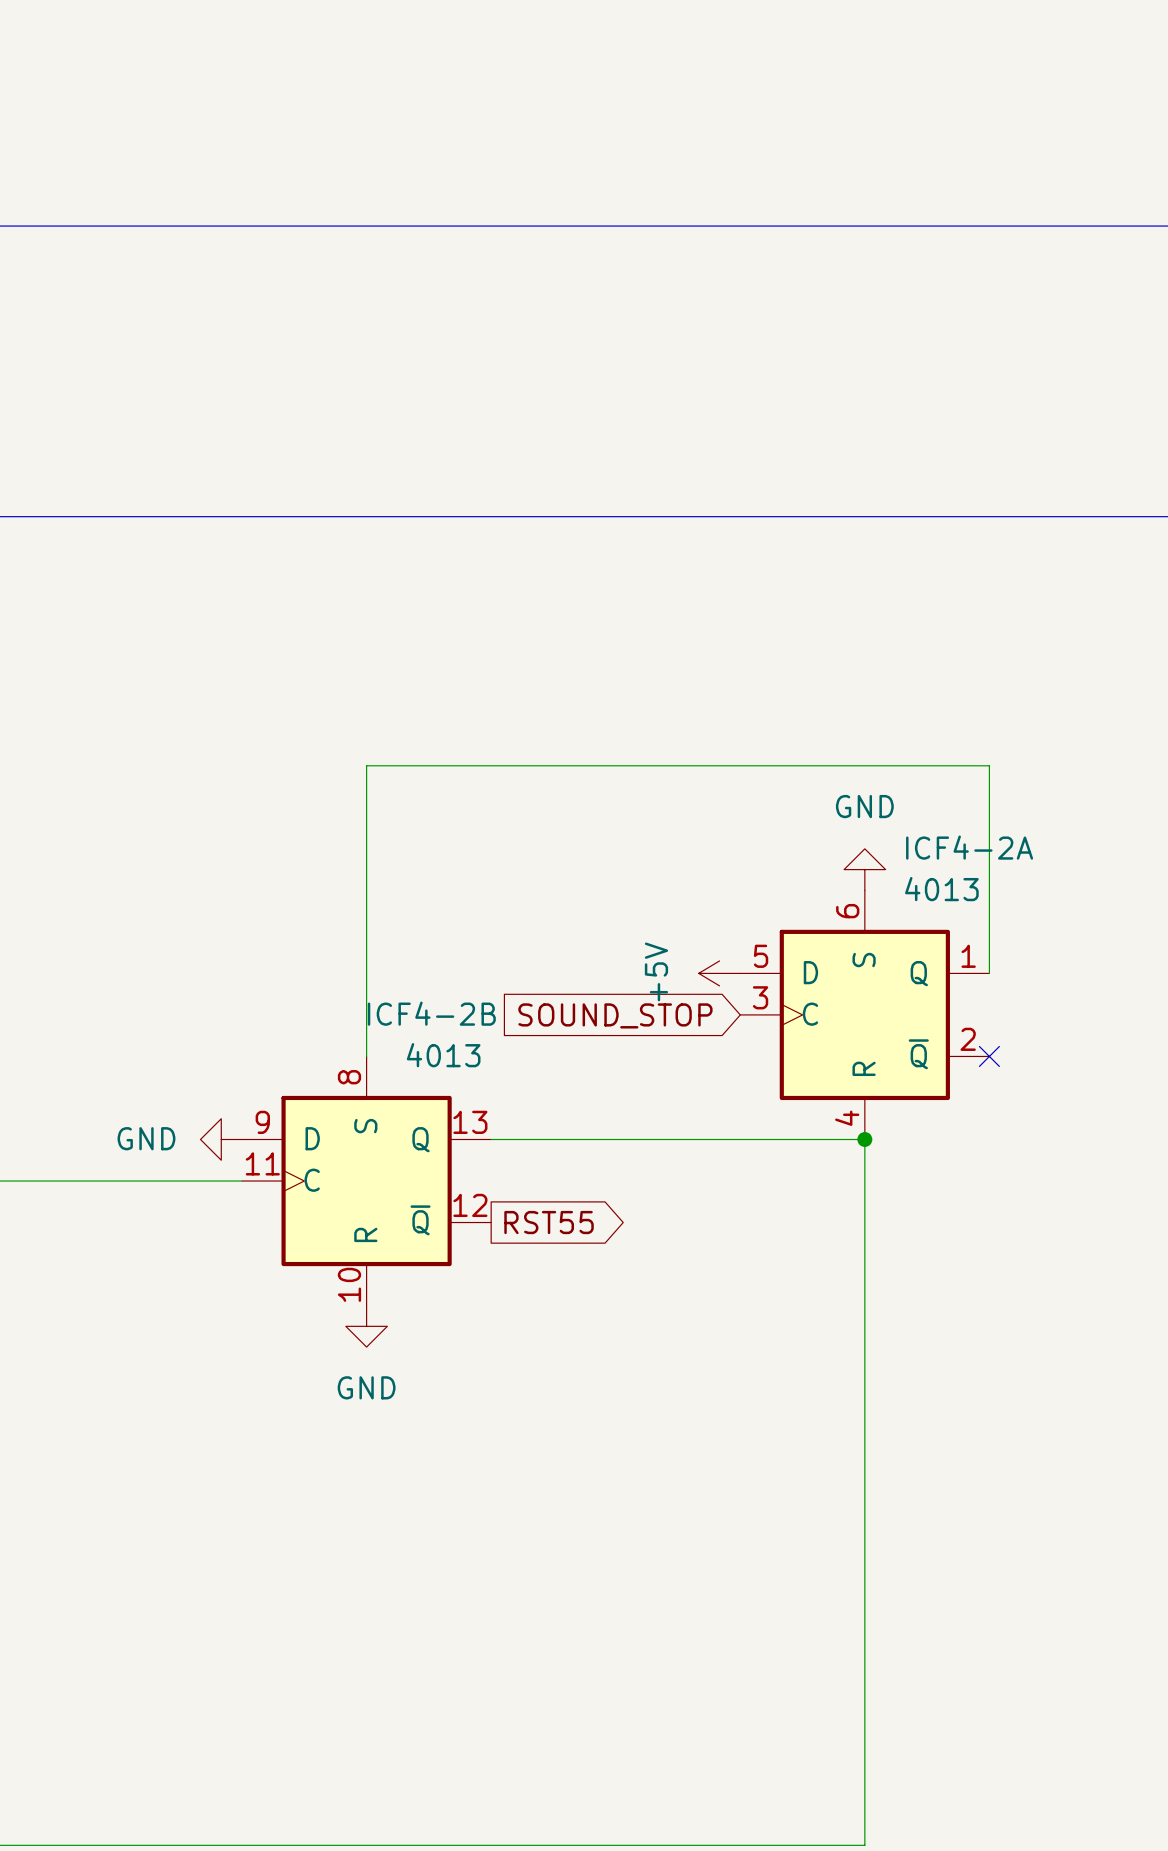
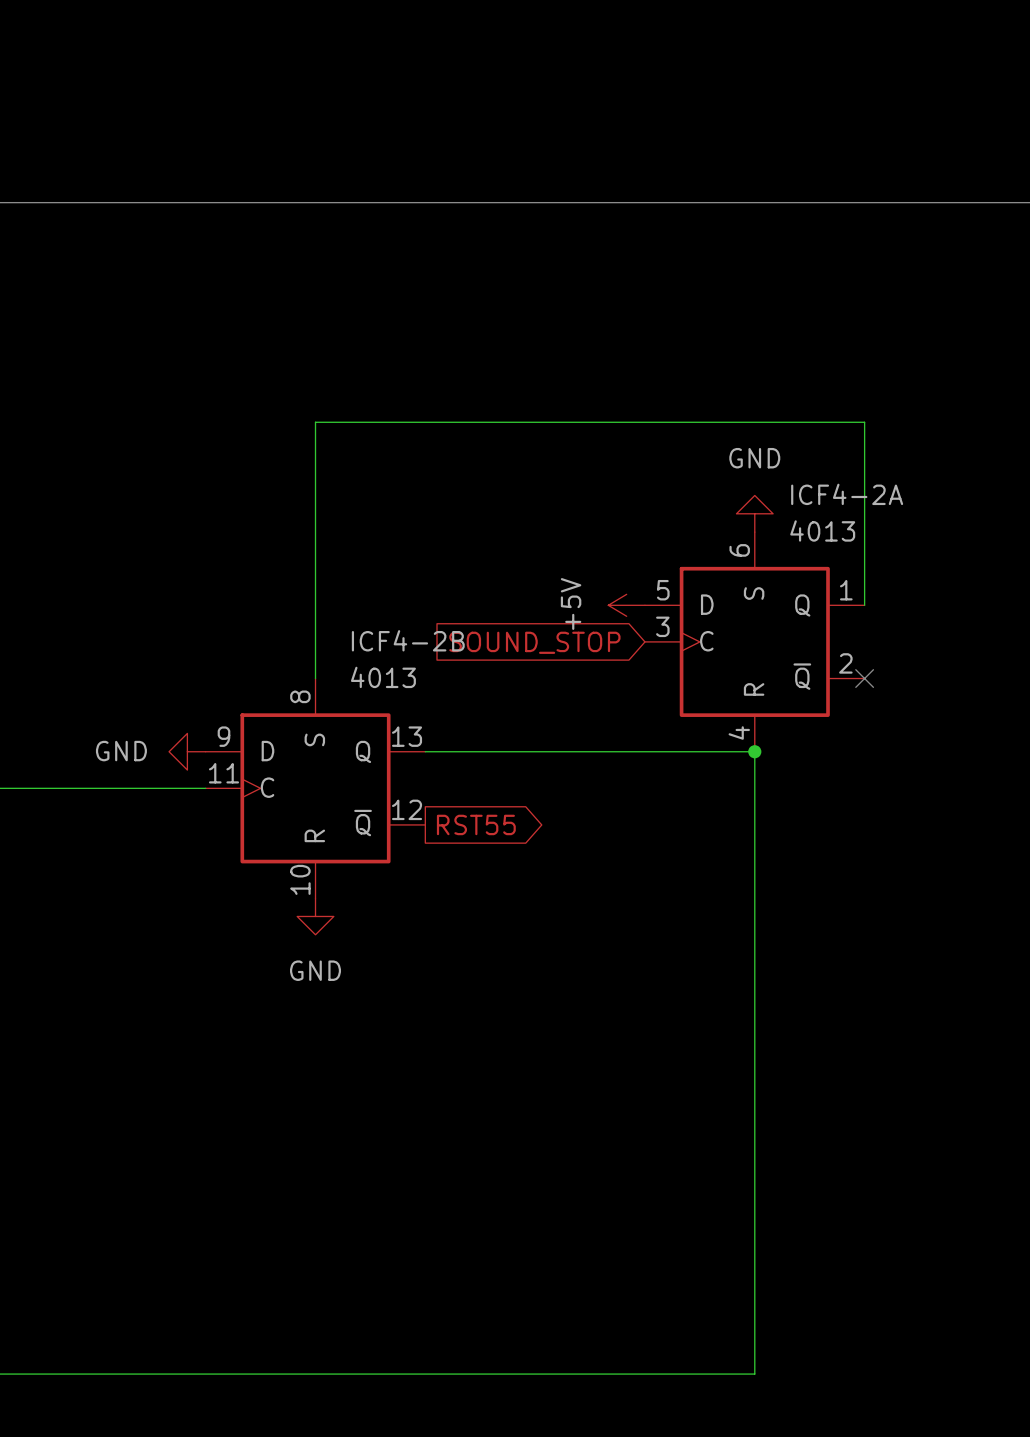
ICF4-2B name position: ICF4-2B (431, 1013) -> ICF4-2B (408, 640)

